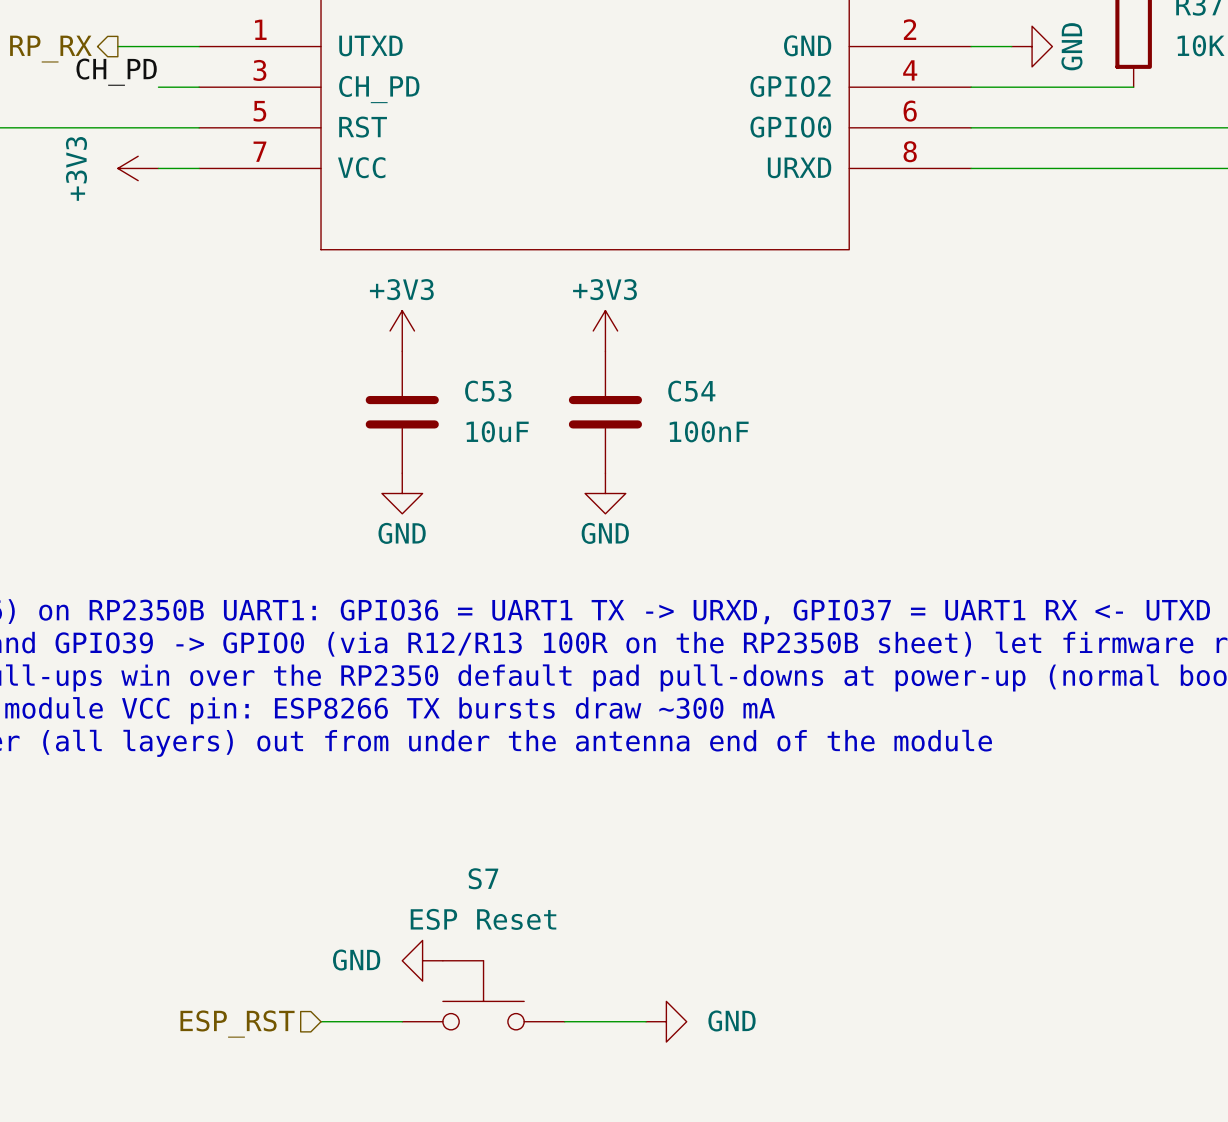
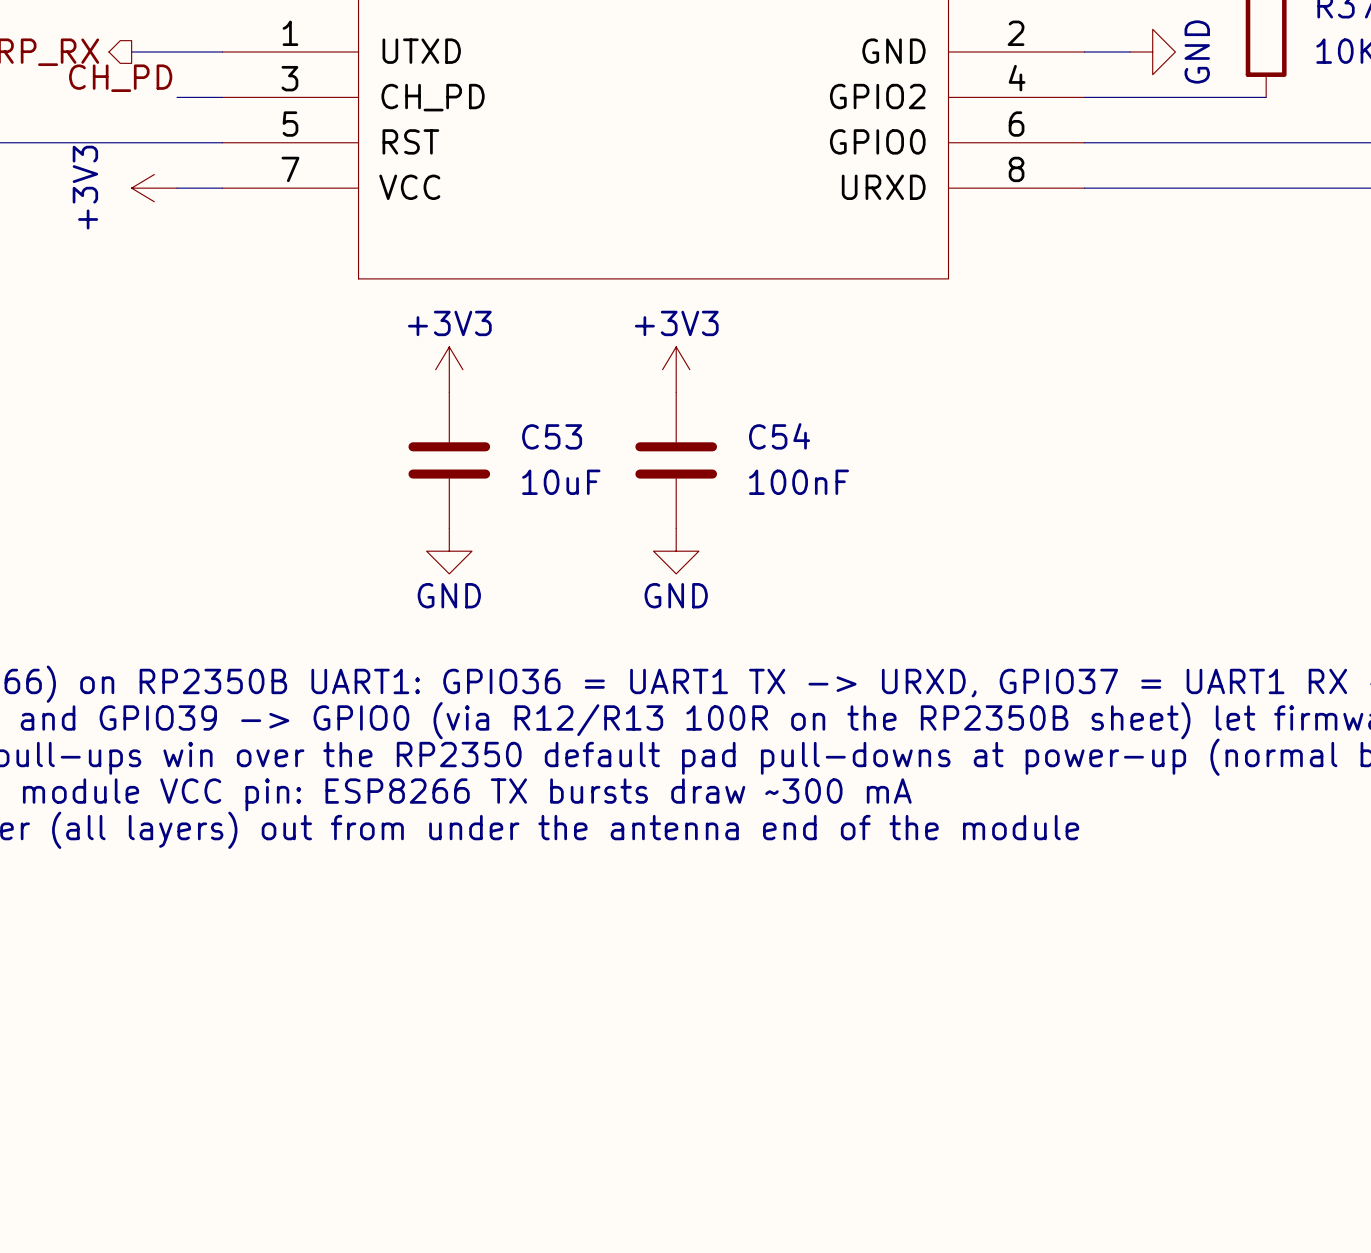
power symbol: GND (422, 960) -> none
S7: ESP Reset (483, 995) -> none
wire: (321, 1021) (402, 1021) -> none
wire: (564, 1021) (646, 1021) -> none
power symbol: GND (666, 1021) -> none
hierarchical label: ESP_RST (237, 1024) -> none

